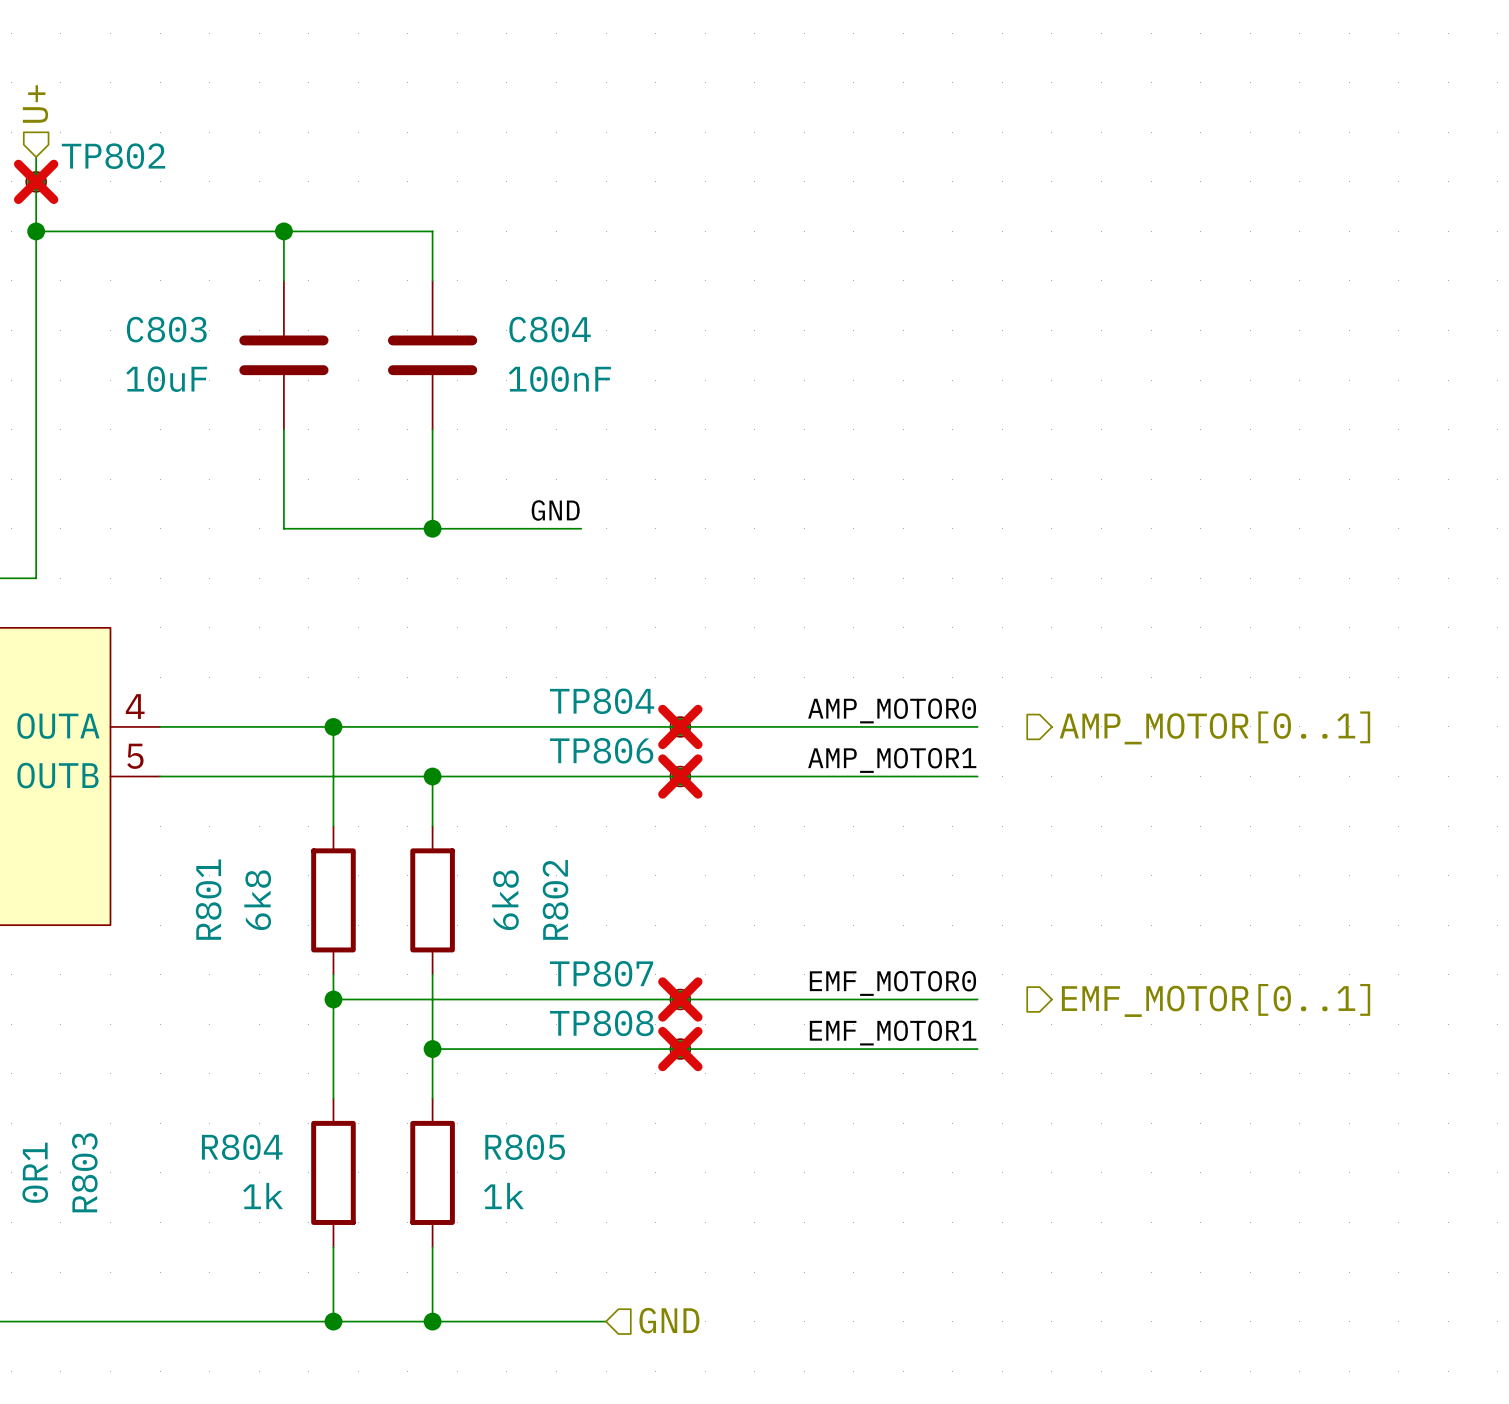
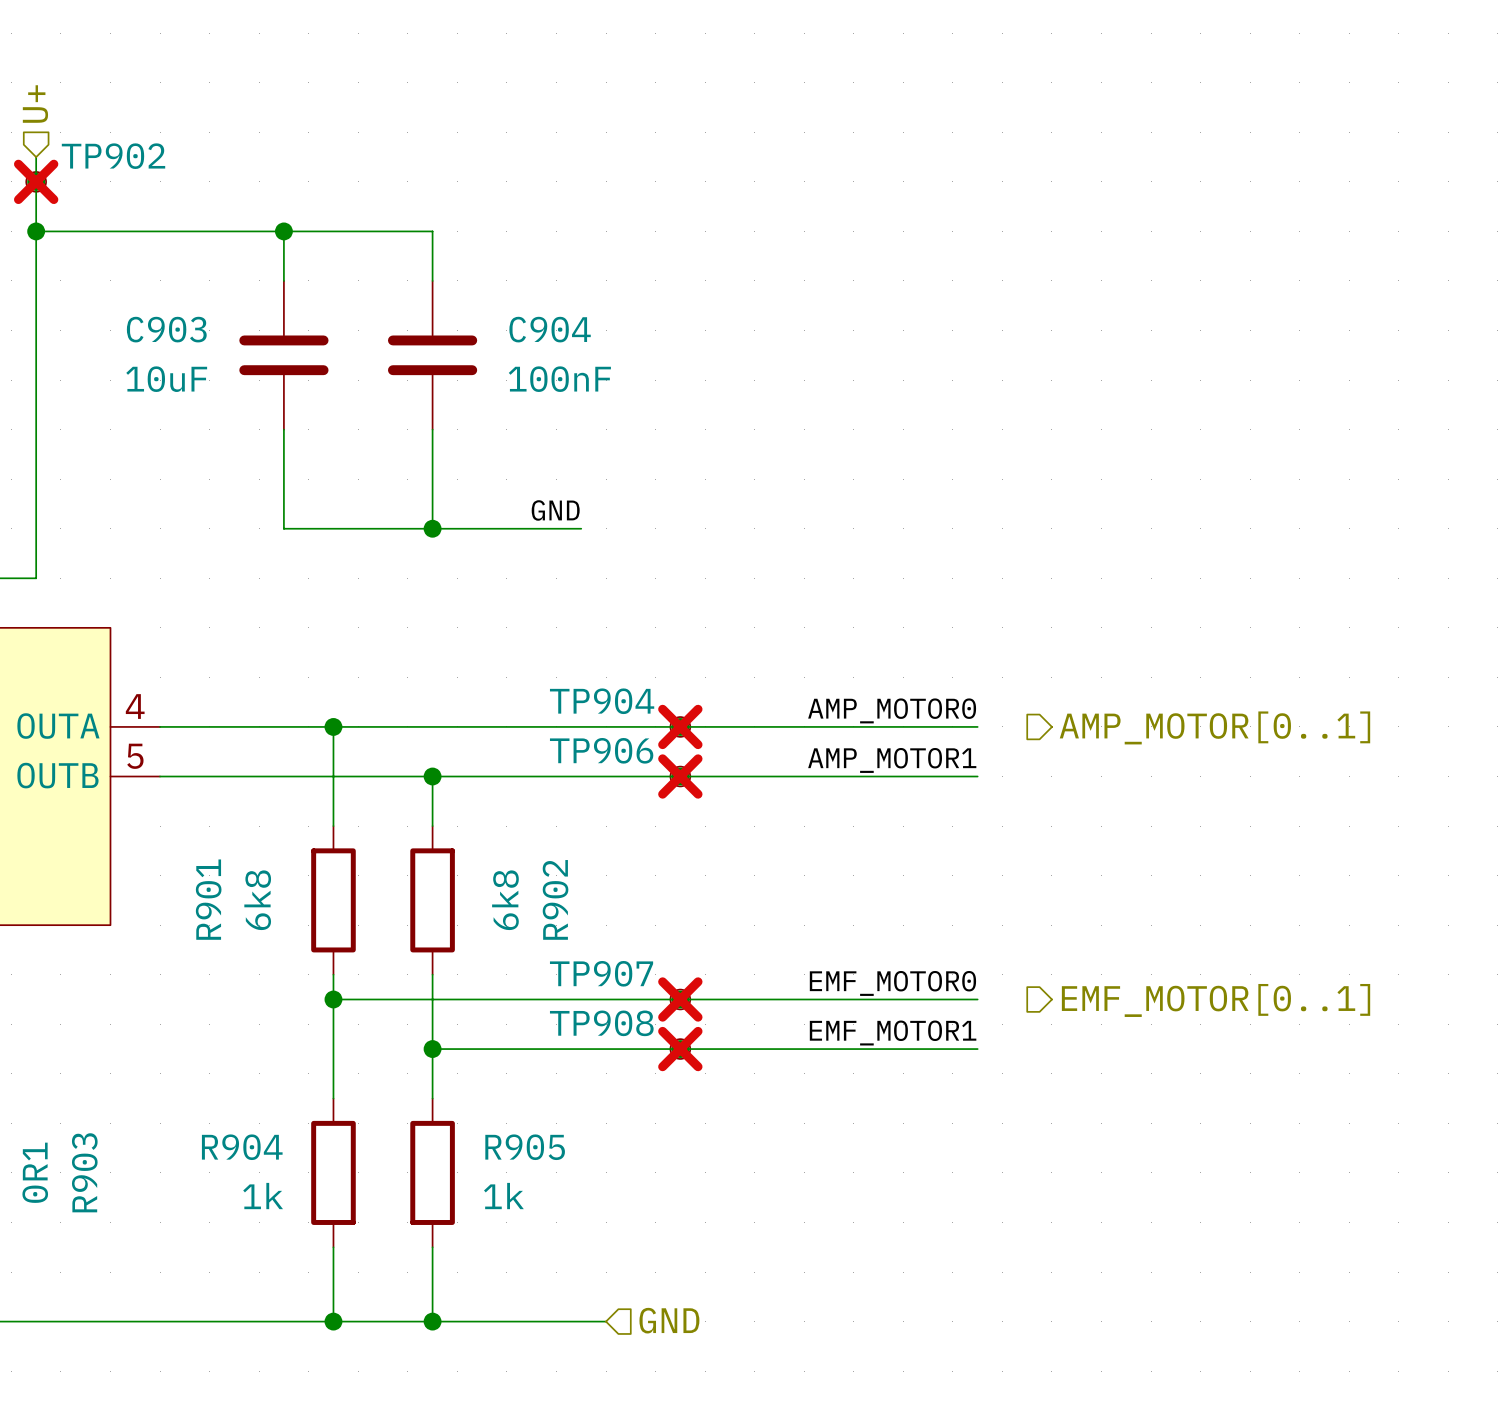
TP802 name: TP802 (113, 156) -> TP902 (113, 156)
C803 name: C803 (166, 329) -> C903 (166, 329)
C804 name: C804 (550, 329) -> C904 (550, 329)
TP804 name: TP804 (602, 701) -> TP904 (602, 701)
TP806 name: TP806 (601, 750) -> TP906 (601, 750)
R801 name: R801 (208, 899) -> R901 (208, 899)
R802 name: R802 (555, 899) -> R902 (555, 899)
TP807 name: TP807 (601, 973) -> TP907 (601, 973)
TP808 name: TP808 (601, 1023) -> TP908 (601, 1023)
R804 name: R804 (242, 1147) -> R904 (242, 1147)
R805 name: R805 (525, 1147) -> R905 (525, 1147)
R803 name: R803 (84, 1172) -> R903 (84, 1172)

